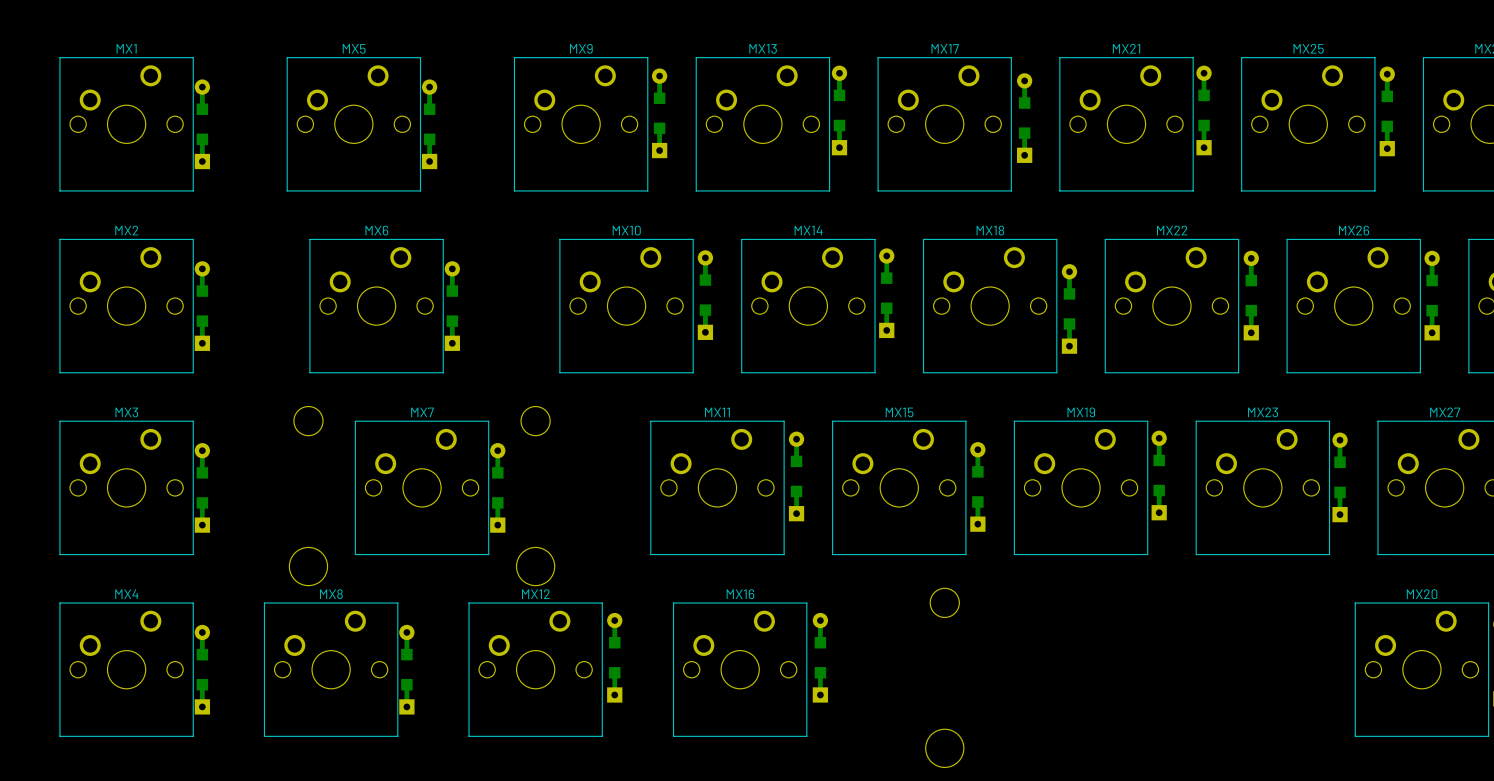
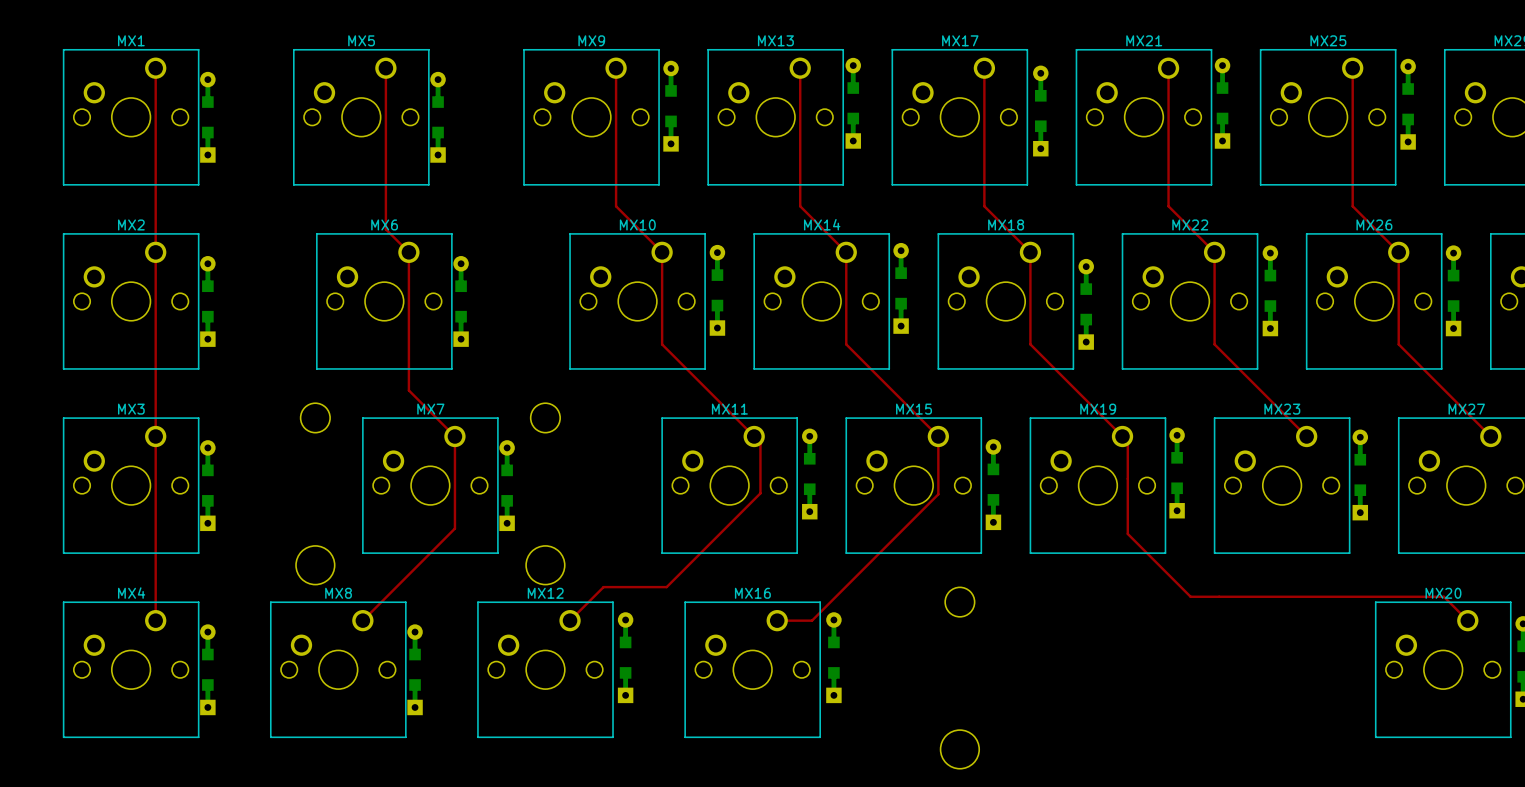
top track: none -> (155, 68) (155, 620)
top track: none -> (385, 68) (385, 229) (408, 252) (408, 390) (454, 436) (454, 528) (362, 620)
top track: none -> (616, 68) (616, 206) (662, 252) (662, 344) (760, 444) (760, 493) (666, 587) (603, 587) (570, 620)
top track: none -> (800, 68) (800, 206) (846, 252) (846, 344) (938, 436) (938, 494) (812, 620) (777, 620)
top track: none -> (984, 68) (984, 206) (1030, 252) (1030, 344) (1127, 442) (1127, 533) (1190, 596) (1443, 596) (1467, 620)
top track: none -> (1168, 68) (1168, 206) (1214, 252) (1214, 344) (1306, 436)
top track: none -> (1352, 68) (1352, 206) (1398, 252) (1398, 344) (1490, 436)

